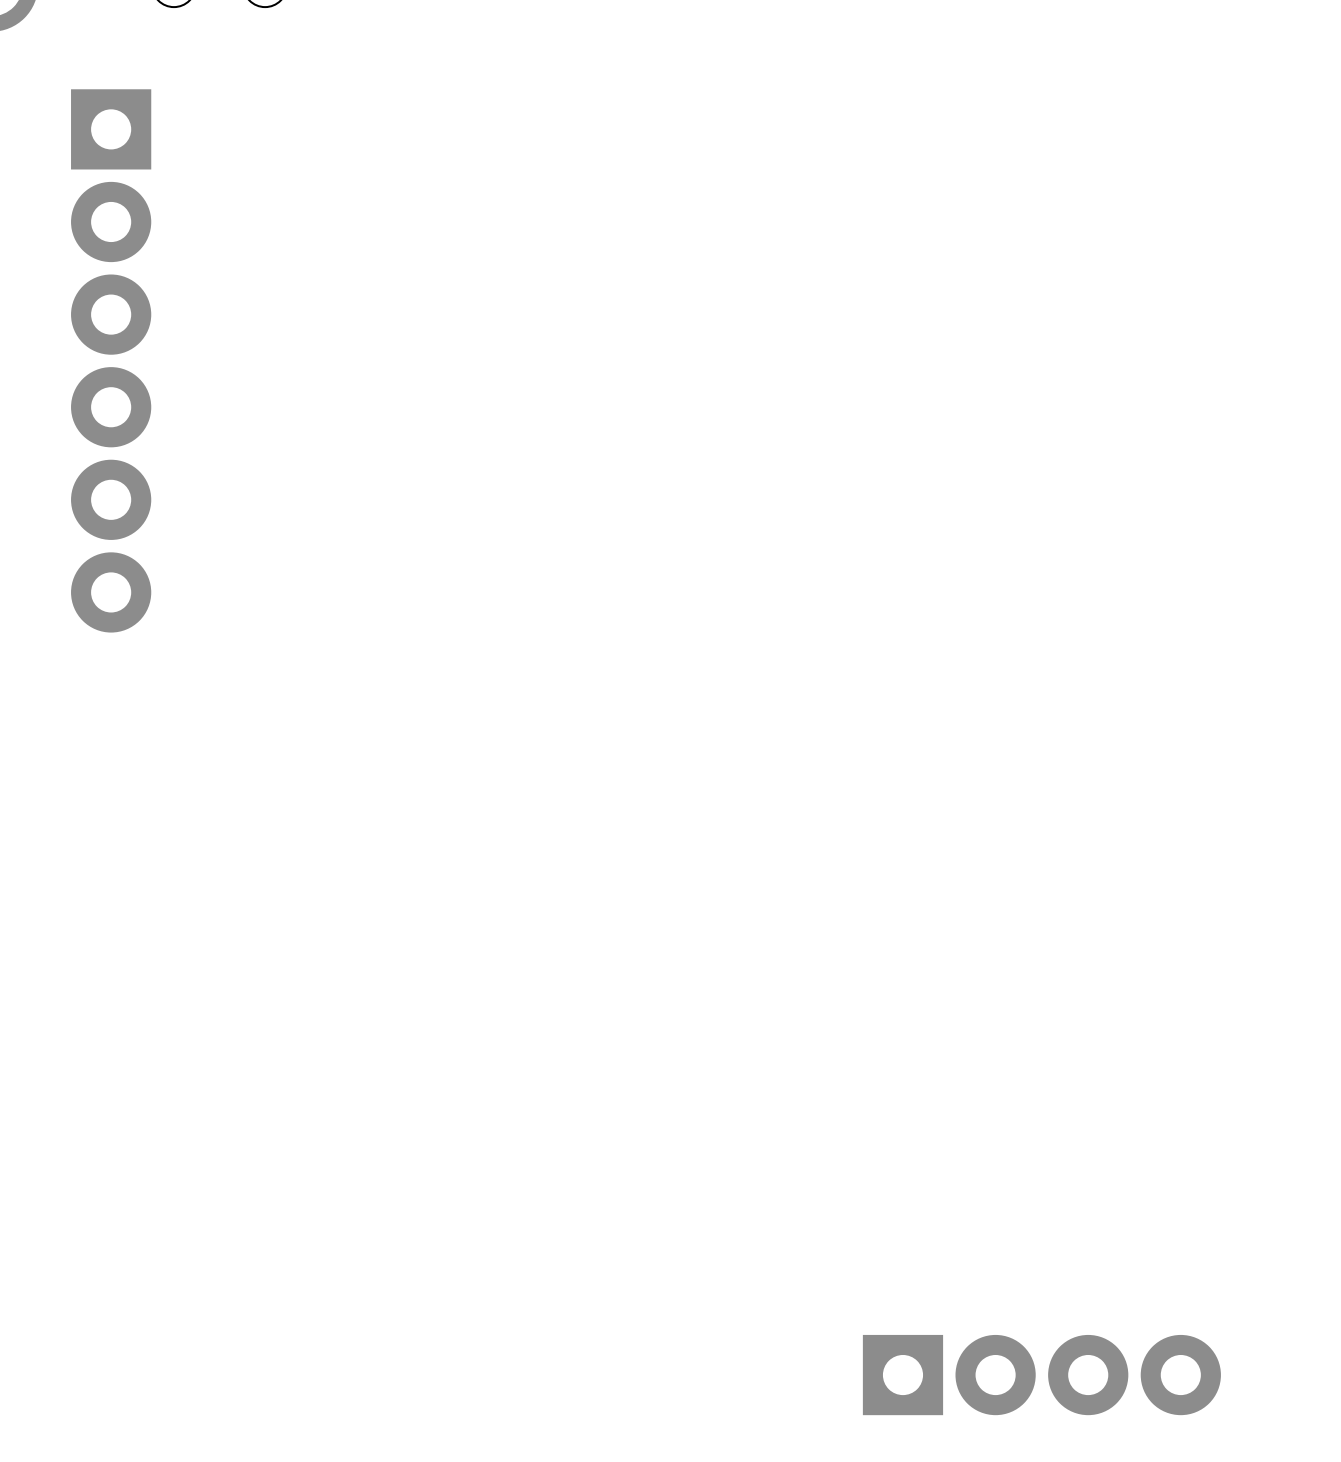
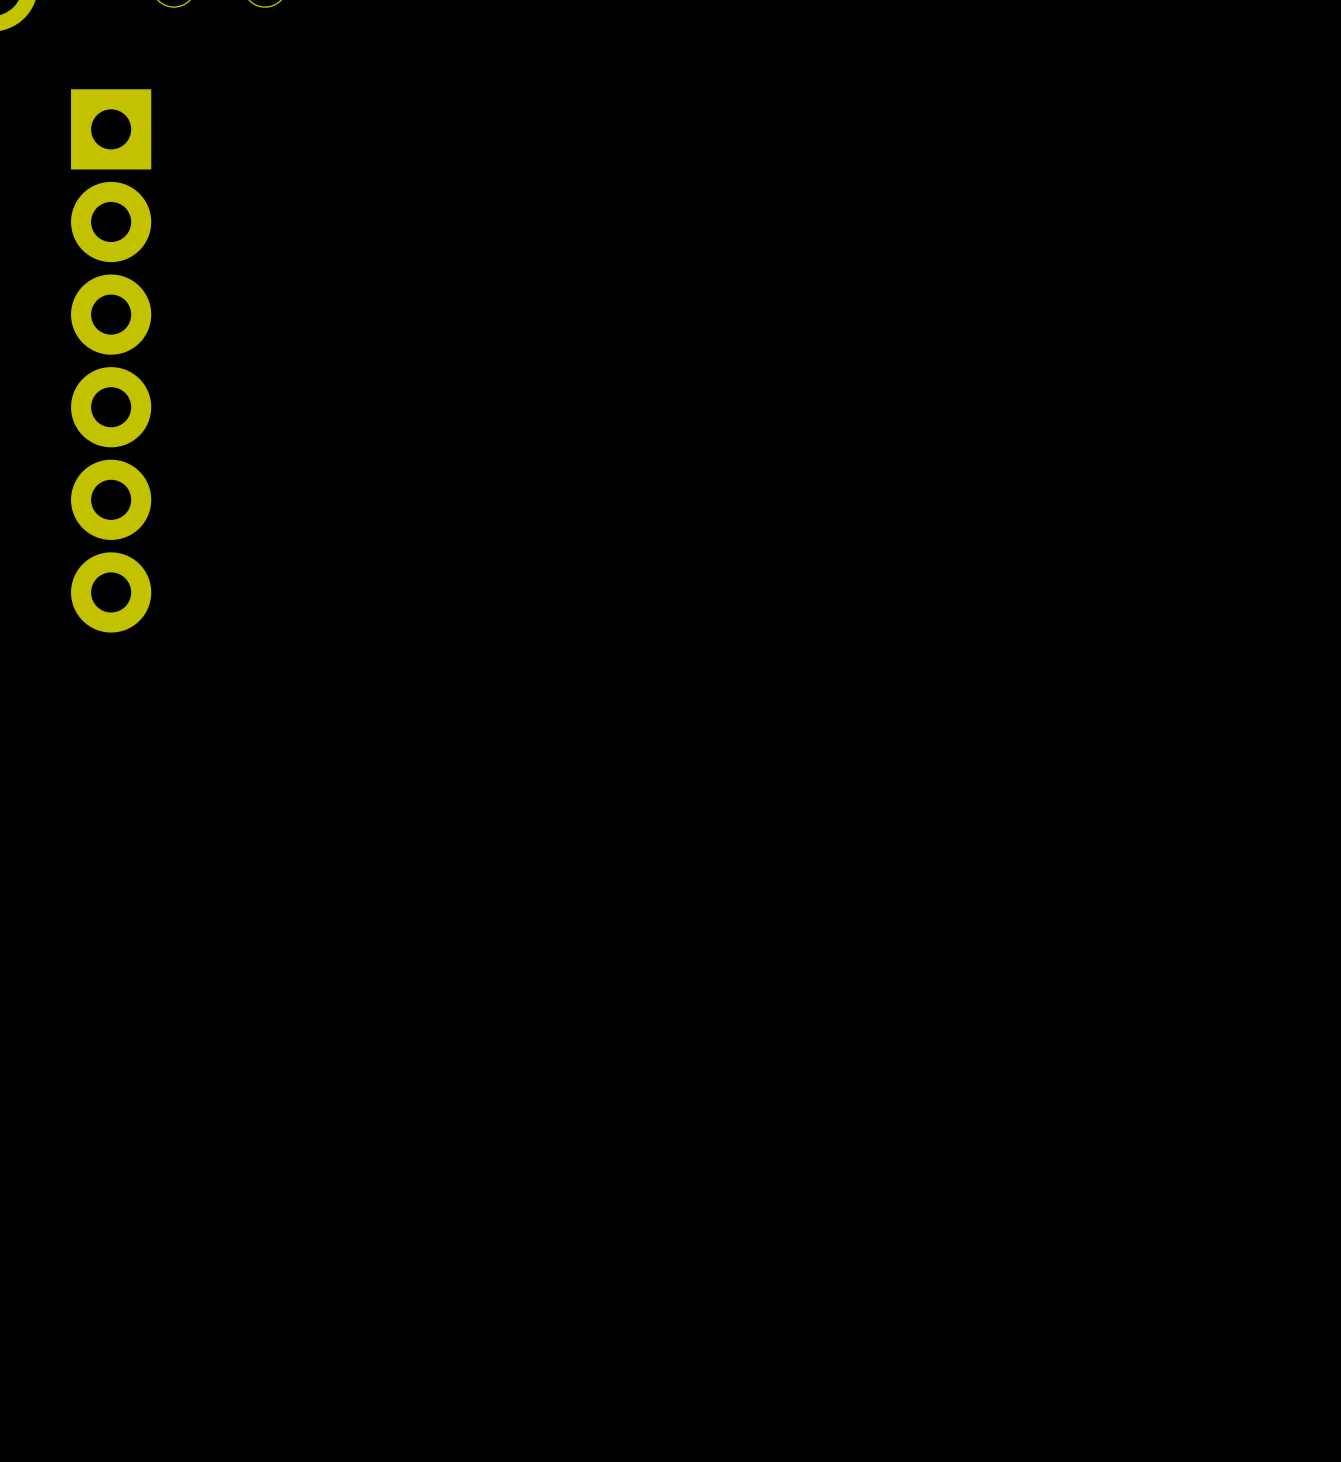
part: (1041, 1375) -> none

